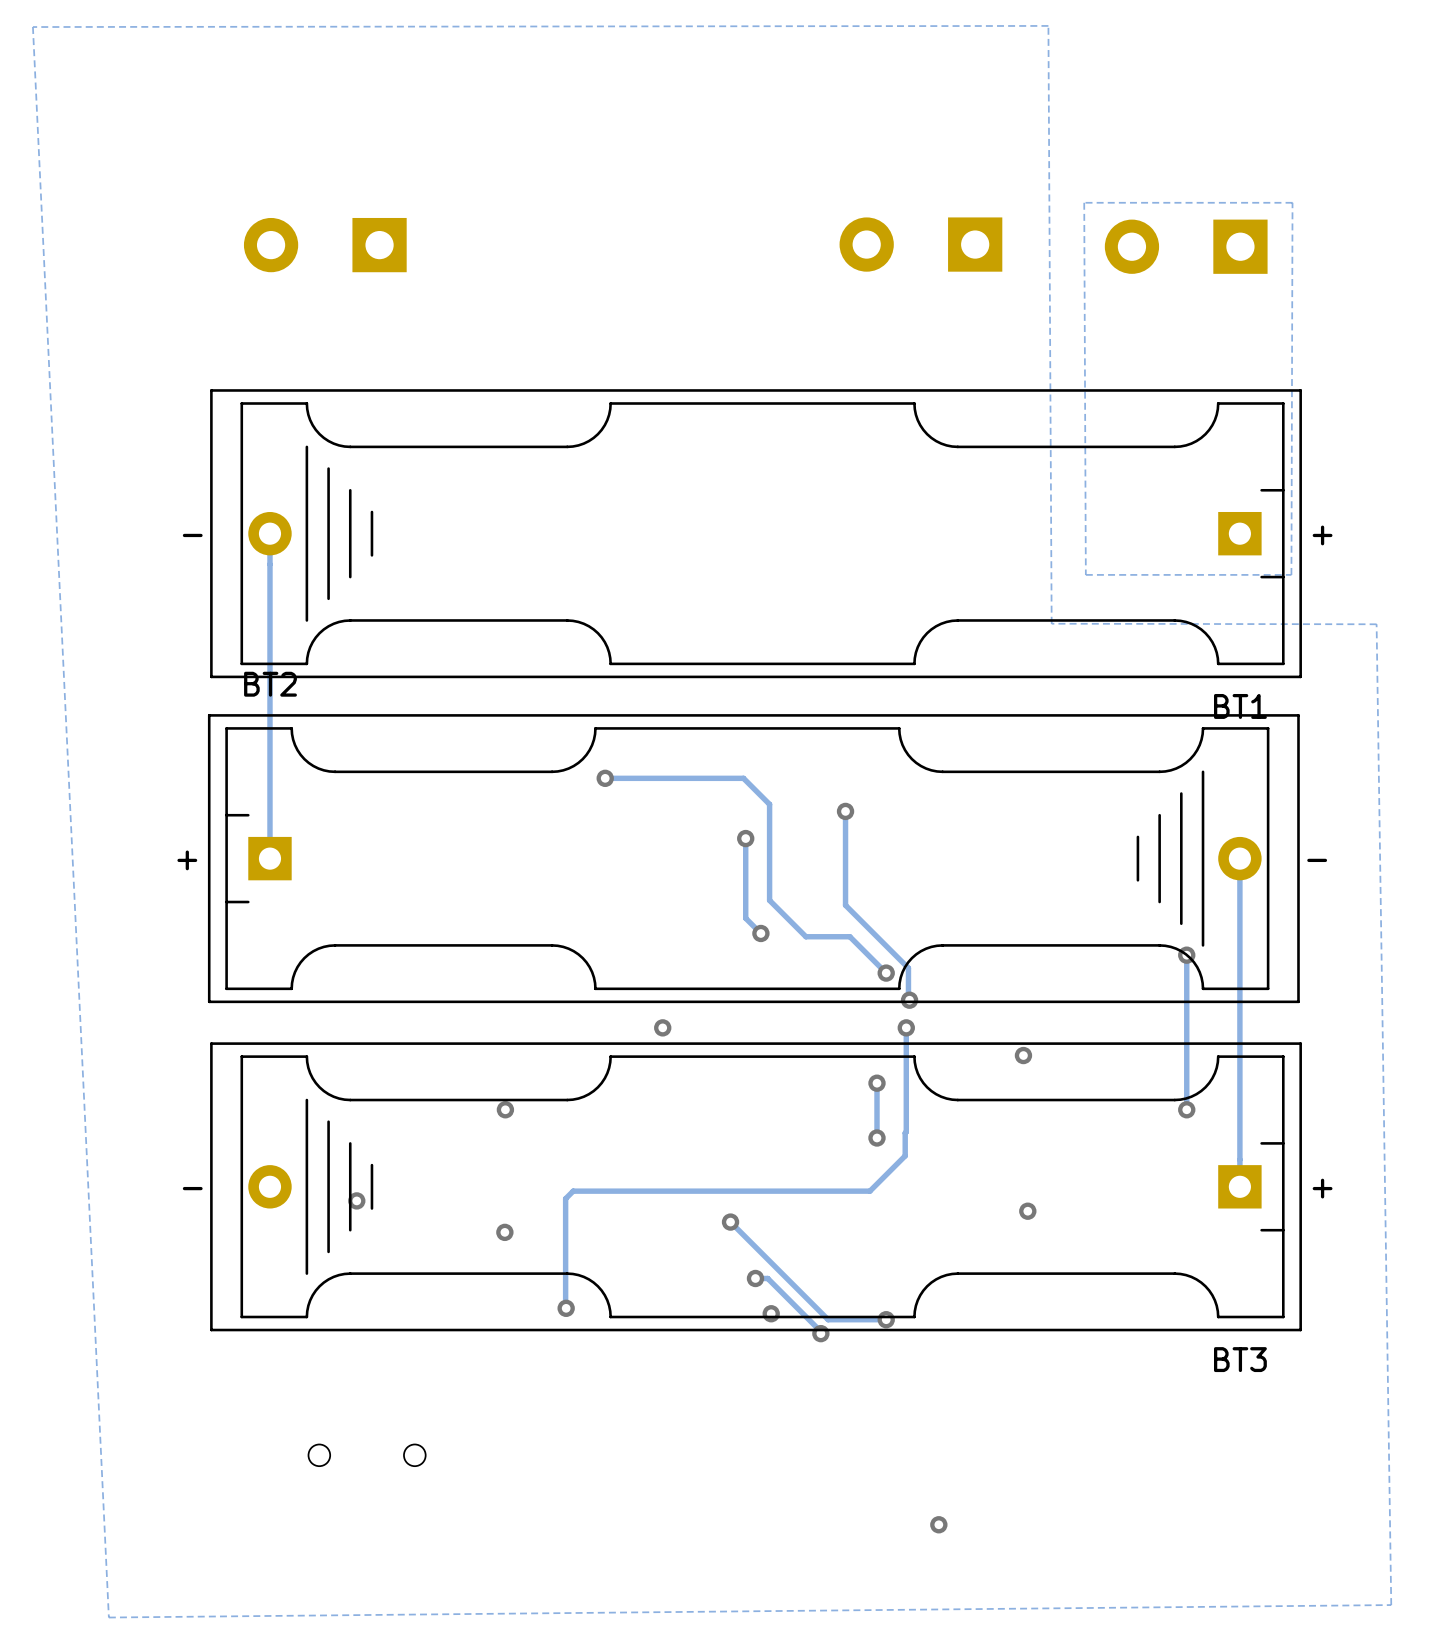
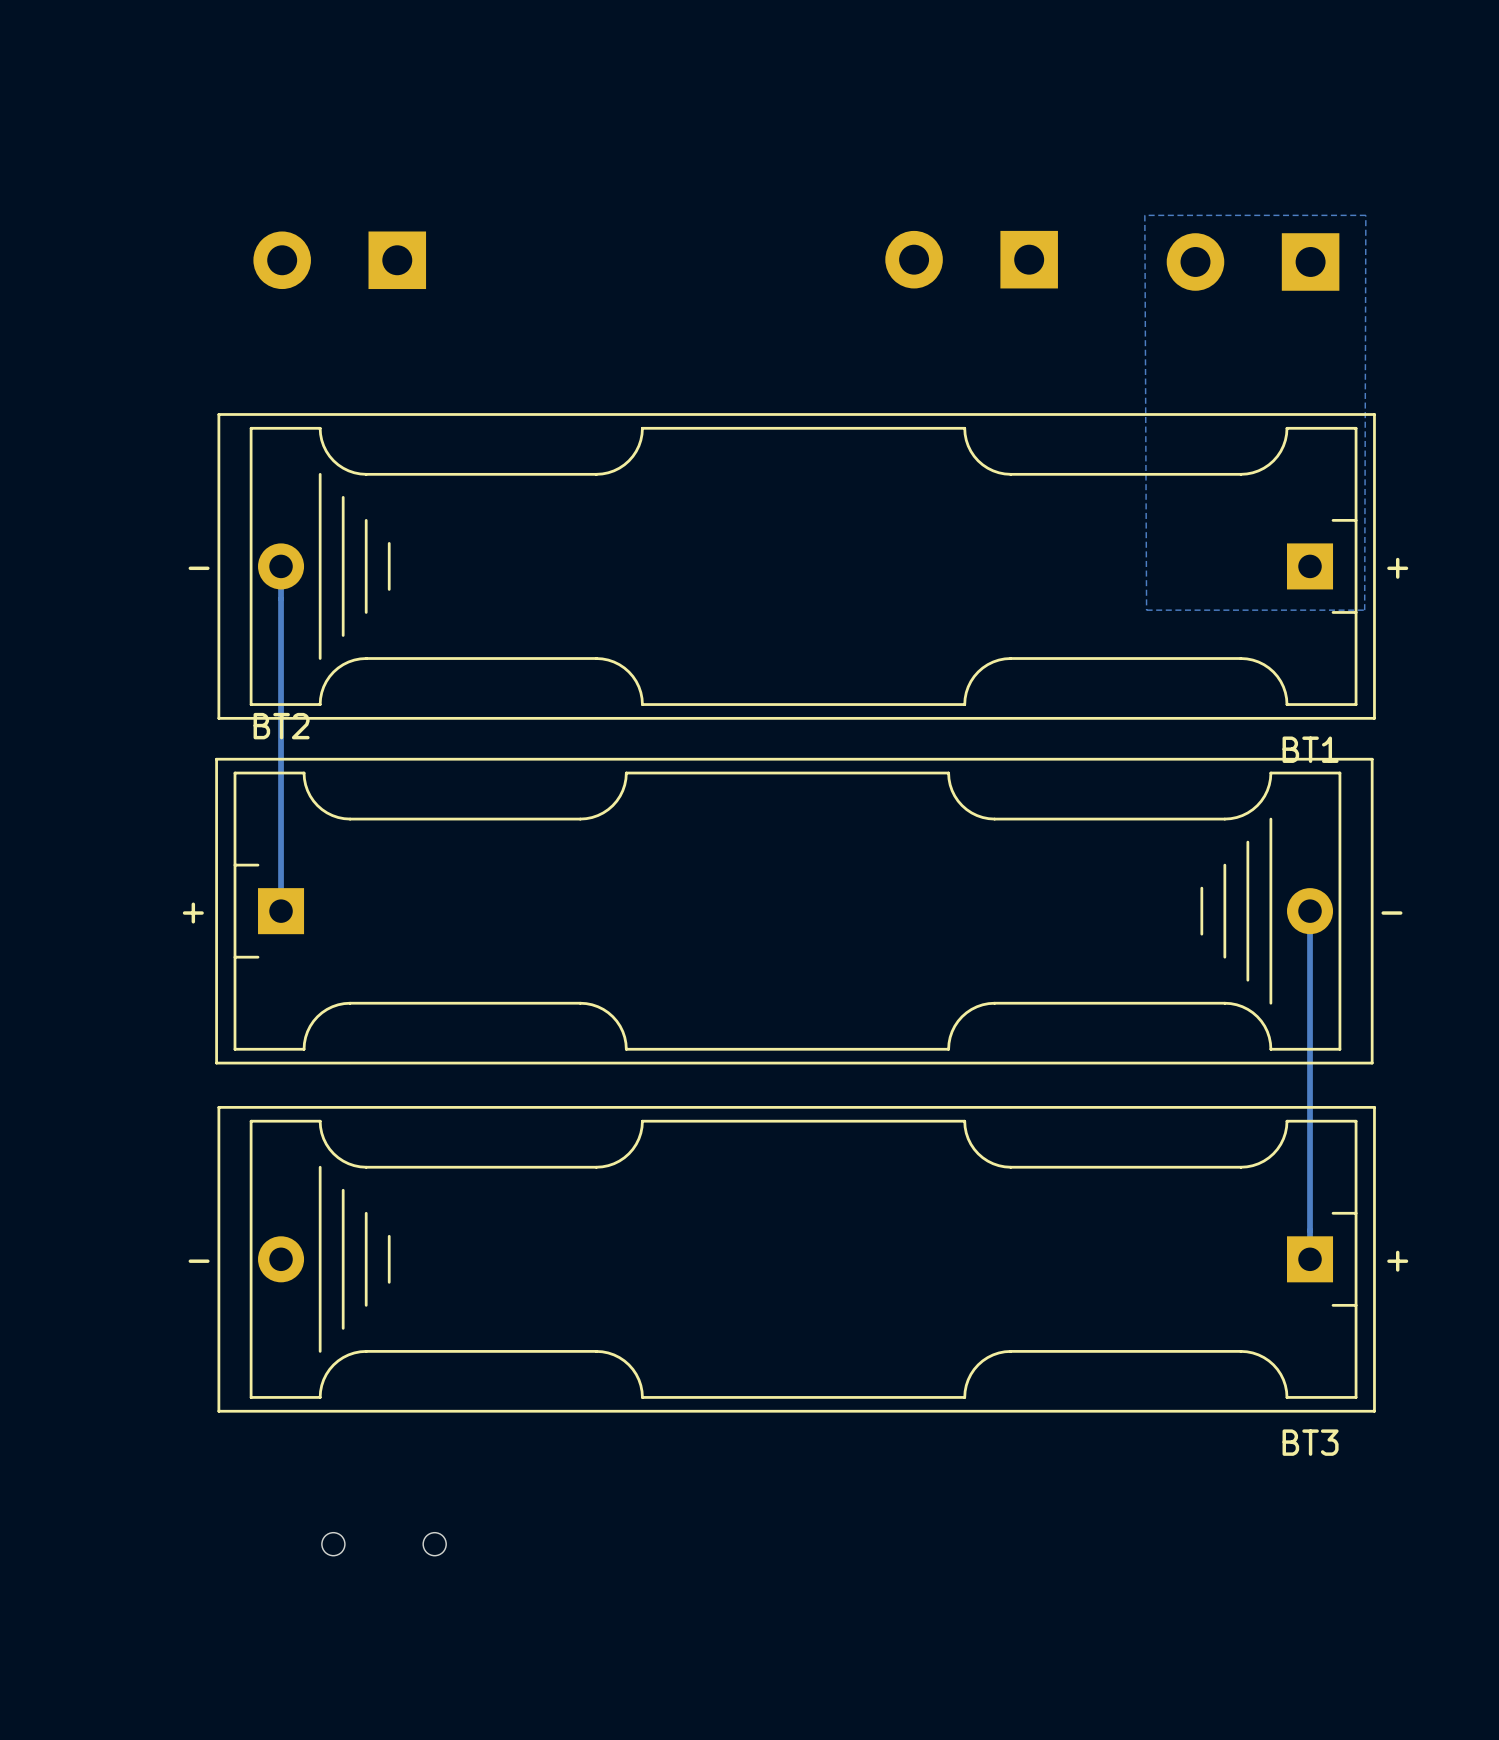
zone outline: (1048, 25) (1051, 623) (1376, 624) (1391, 1605) (108, 1617) (32, 27) (1048, 25) -> none
track: (605, 778) (743, 778) (769, 804) (769, 900) (805, 936) (849, 936) (886, 973) -> none
via: (605, 778) -> none
track: (845, 811) (845, 905) (908, 968) (909, 1000) -> none
via: (845, 811) -> none
track: (745, 838) (745, 918) (760, 933) -> none
via: (745, 838) -> none
via: (760, 933) -> none
track: (1186, 955) (1186, 1109) -> none
via: (1186, 955) -> none
via: (886, 973) -> none
via: (909, 1000) -> none
via: (662, 1027) -> none
track: (906, 1027) (905, 1155) (869, 1191) (573, 1191) (565, 1198) (566, 1308) -> none
via: (906, 1027) -> none
via: (1023, 1055) -> none
track: (877, 1083) (877, 1137) -> none
via: (877, 1083) -> none
via: (505, 1109) -> none
via: (1186, 1109) -> none
via: (877, 1137) -> none
via: (356, 1200) -> none
via: (1027, 1211) -> none
track: (730, 1222) (828, 1319) (886, 1319) -> none
via: (730, 1222) -> none
via: (504, 1232) -> none
track: (755, 1278) (767, 1278) (820, 1333) -> none
via: (755, 1278) -> none
via: (566, 1308) -> none
via: (771, 1313) -> none
via: (886, 1319) -> none
via: (820, 1333) -> none
via: (938, 1524) -> none

